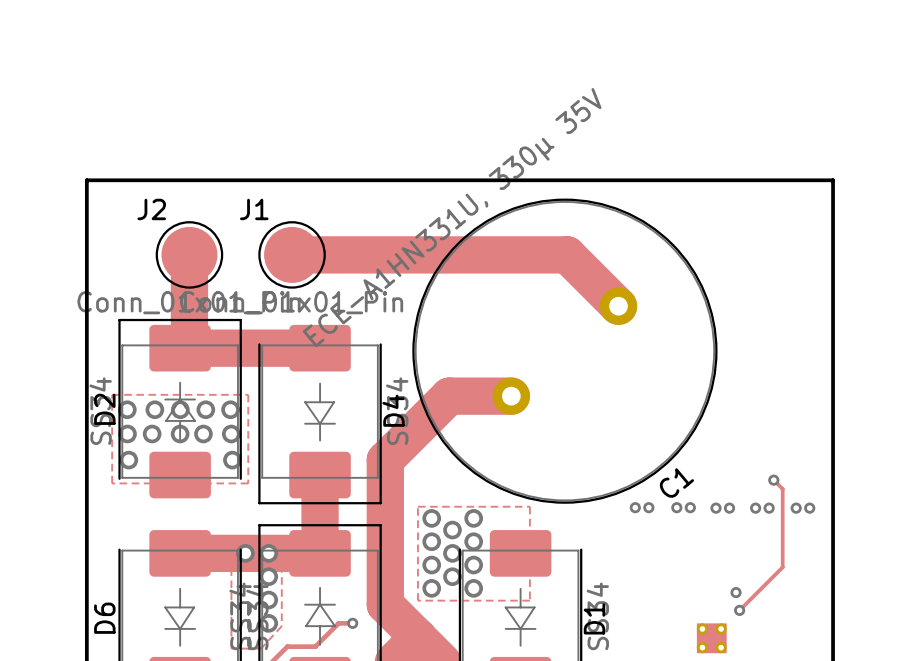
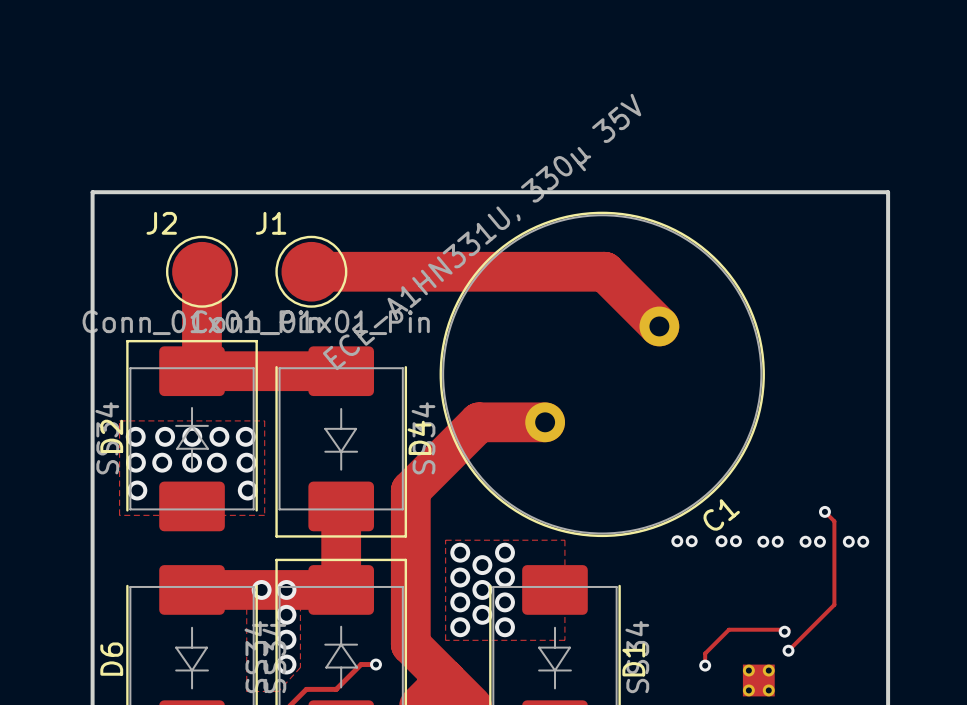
track: none -> (788, 629) (728, 629) (705, 653) (705, 665)
via: none -> (705, 665)

